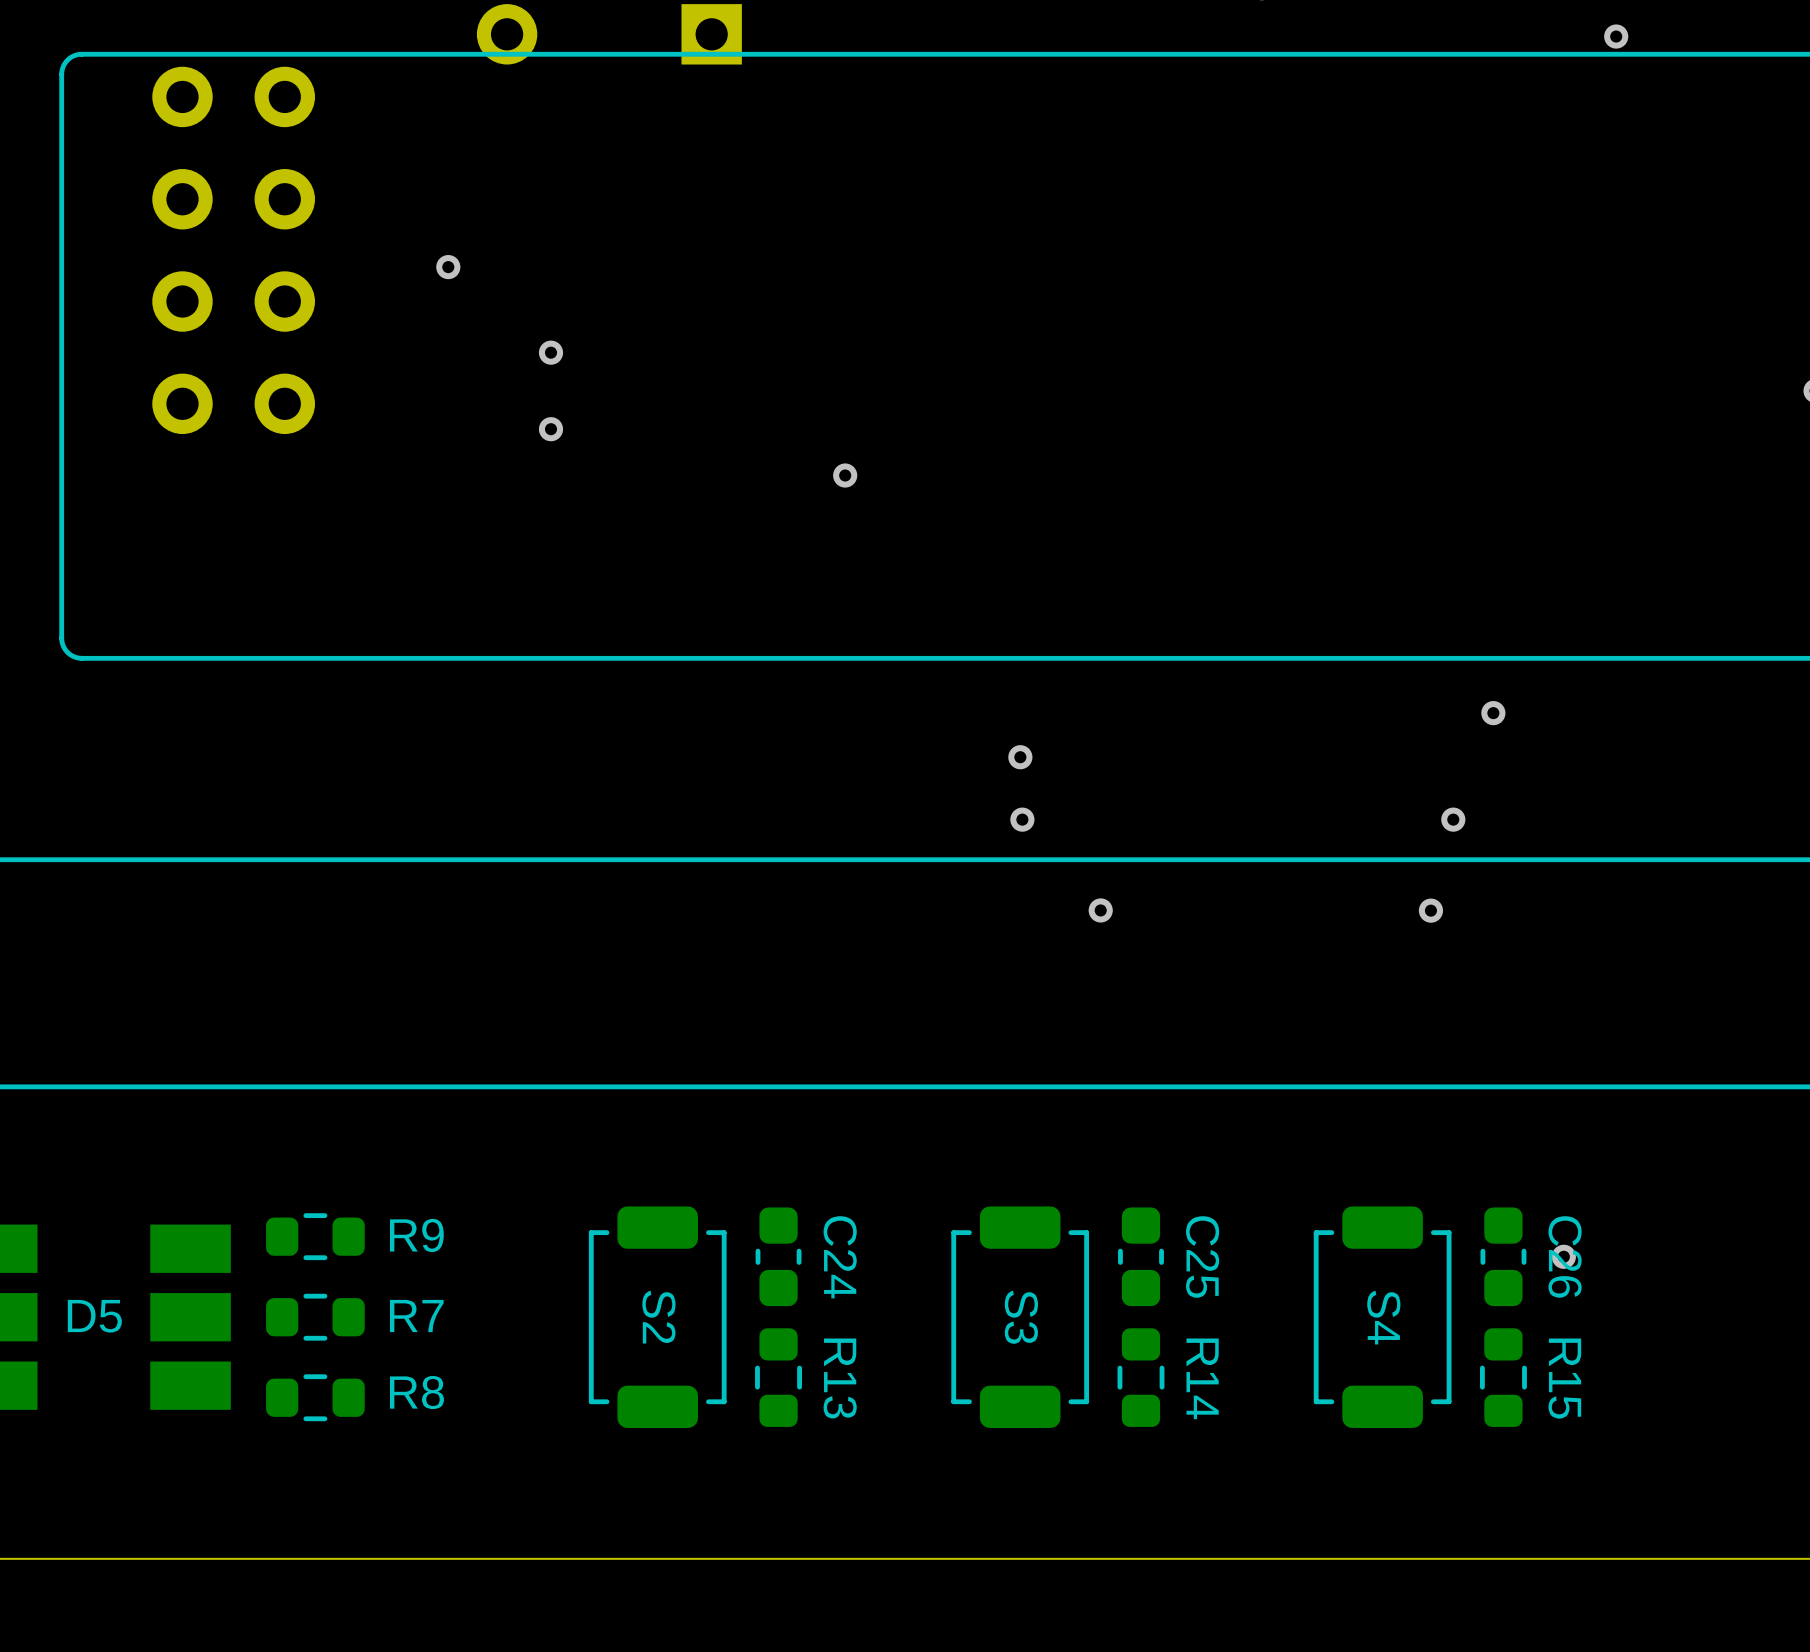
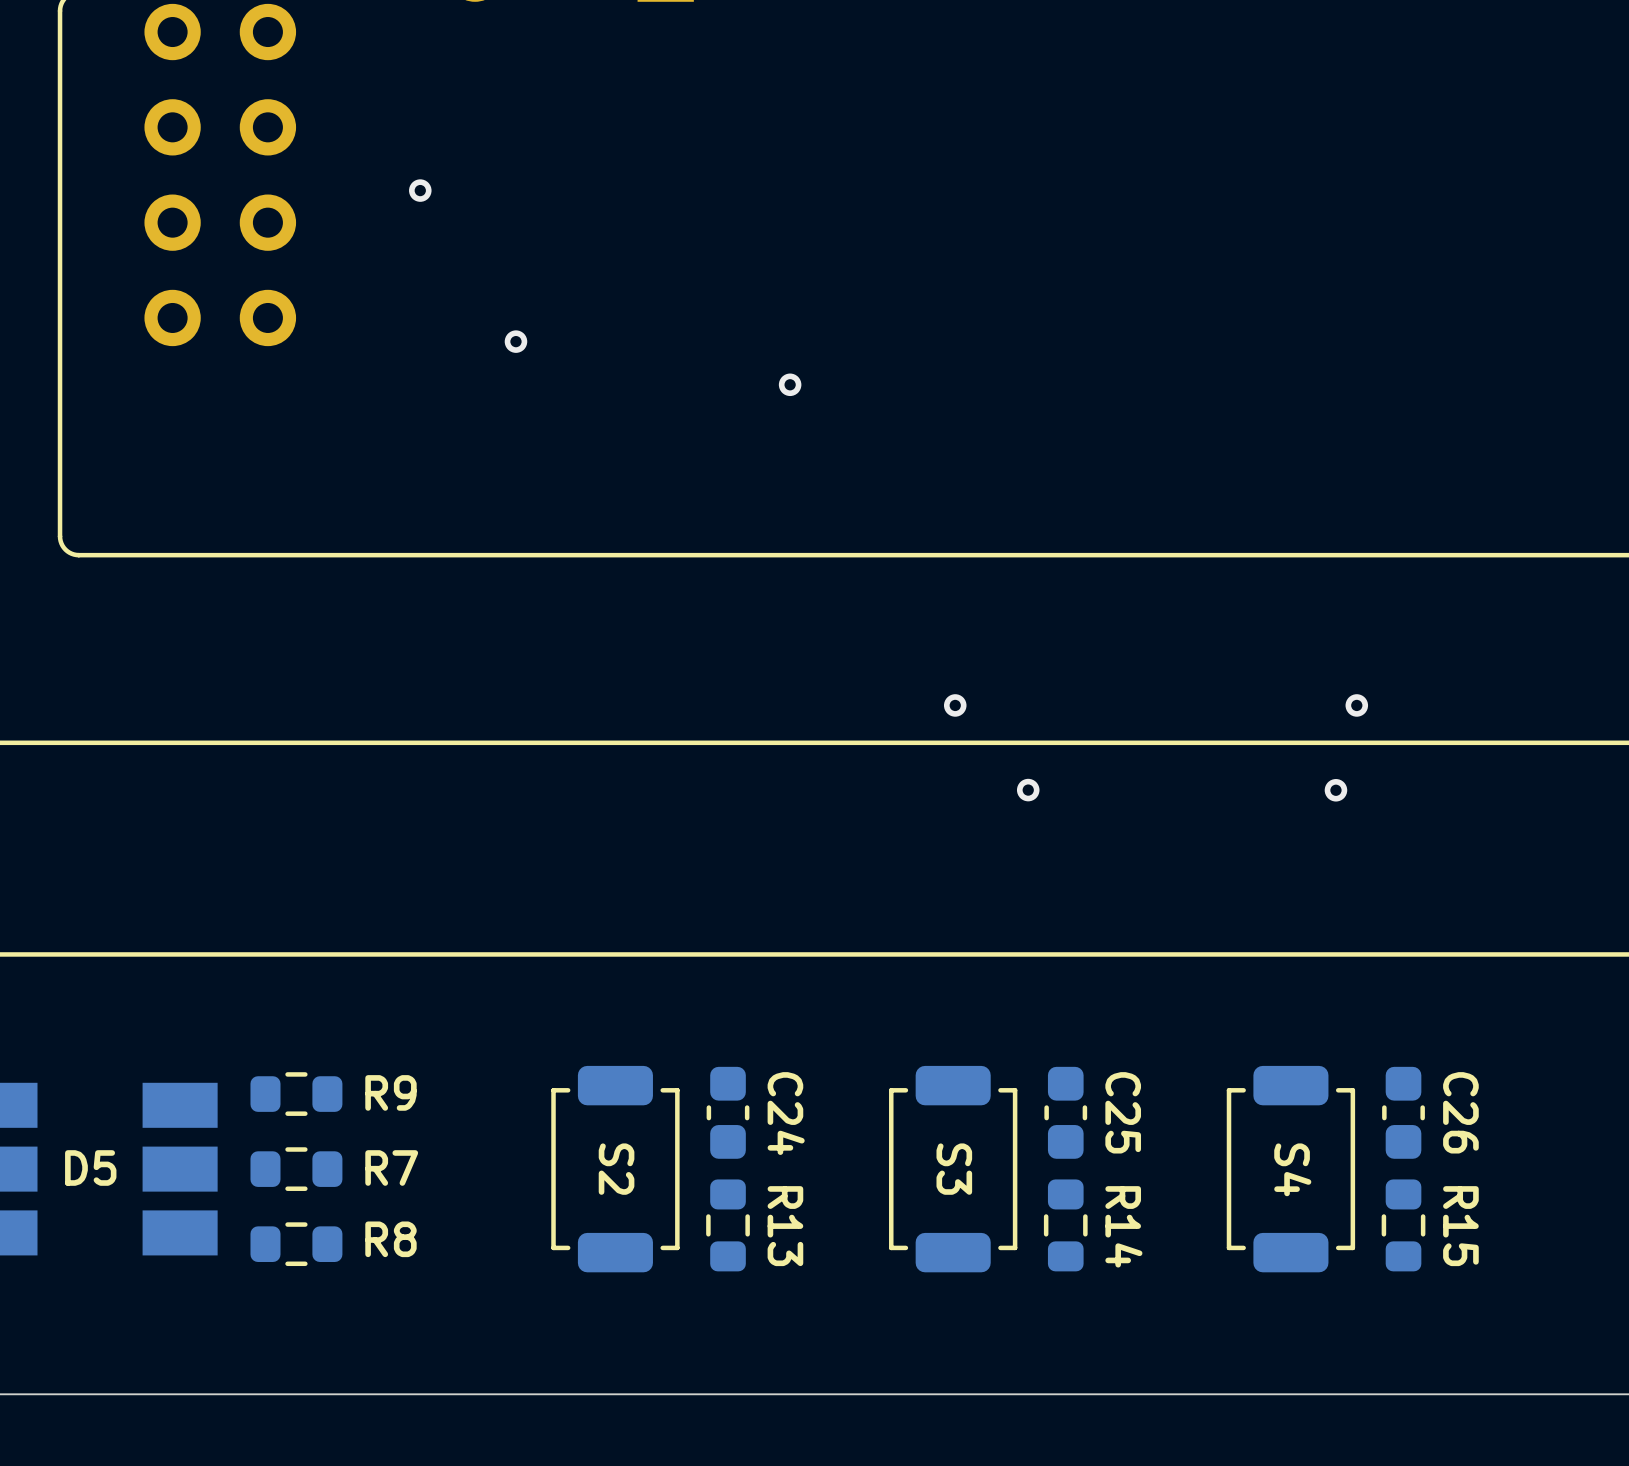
via: (550, 352) -> none
via: (1493, 713) -> none
via: (1020, 757) -> none
via: (1563, 1256) -> none

